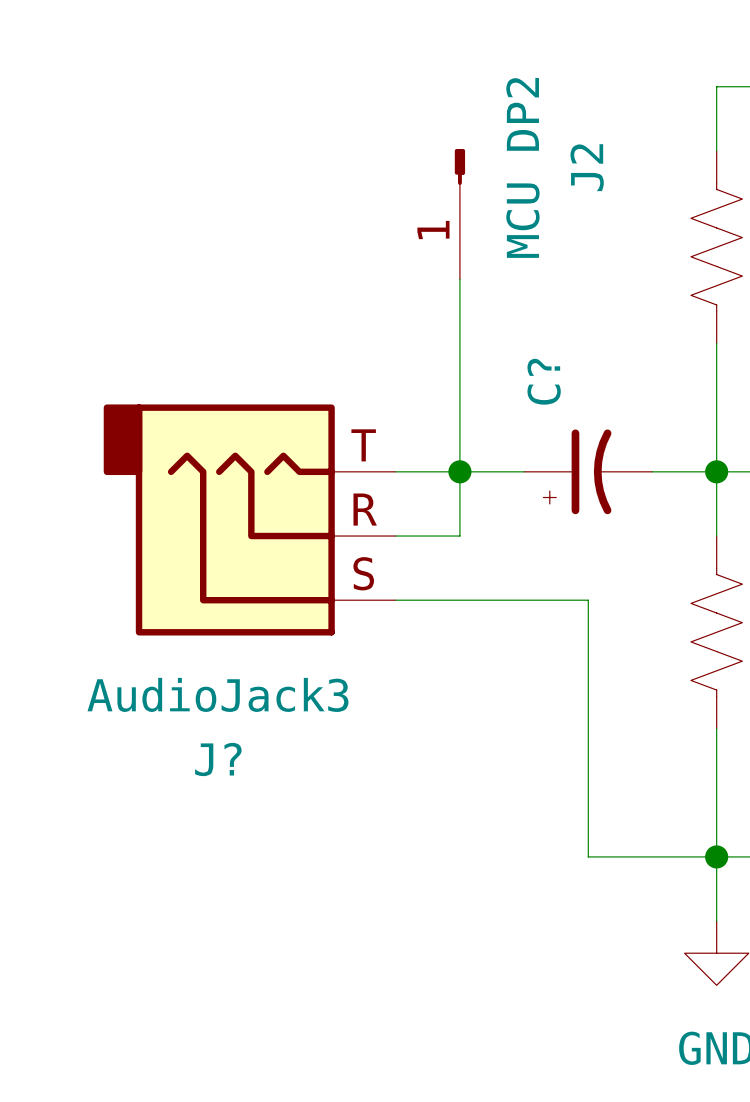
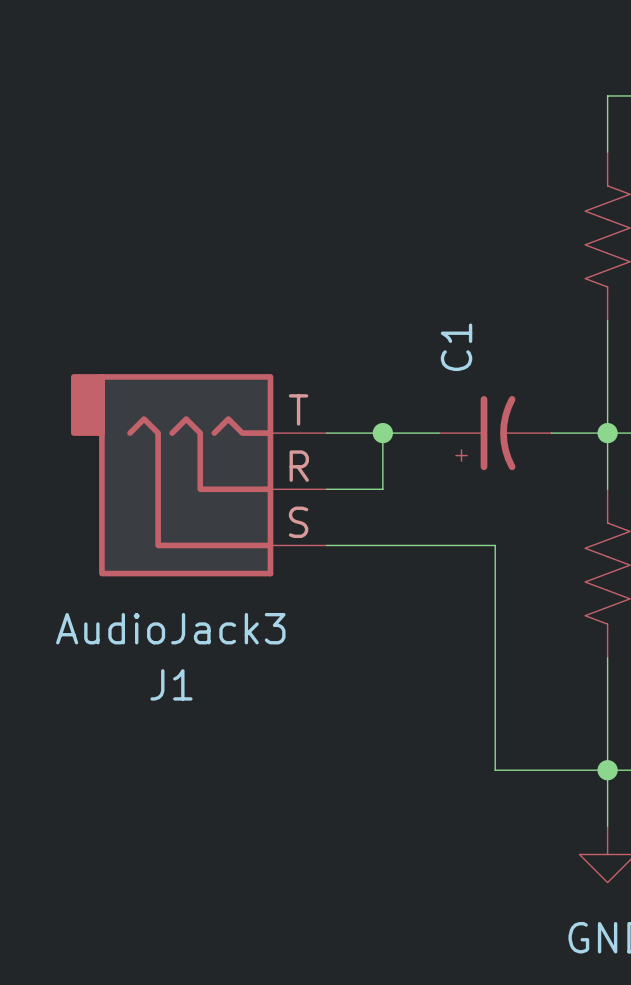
J2: MCU DP2 (459, 214) -> none
wire: (459, 279) (459, 471) -> none
C? name: C? (544, 381) -> C1 (456, 347)
J? name: J? (218, 759) -> J1 (171, 684)

